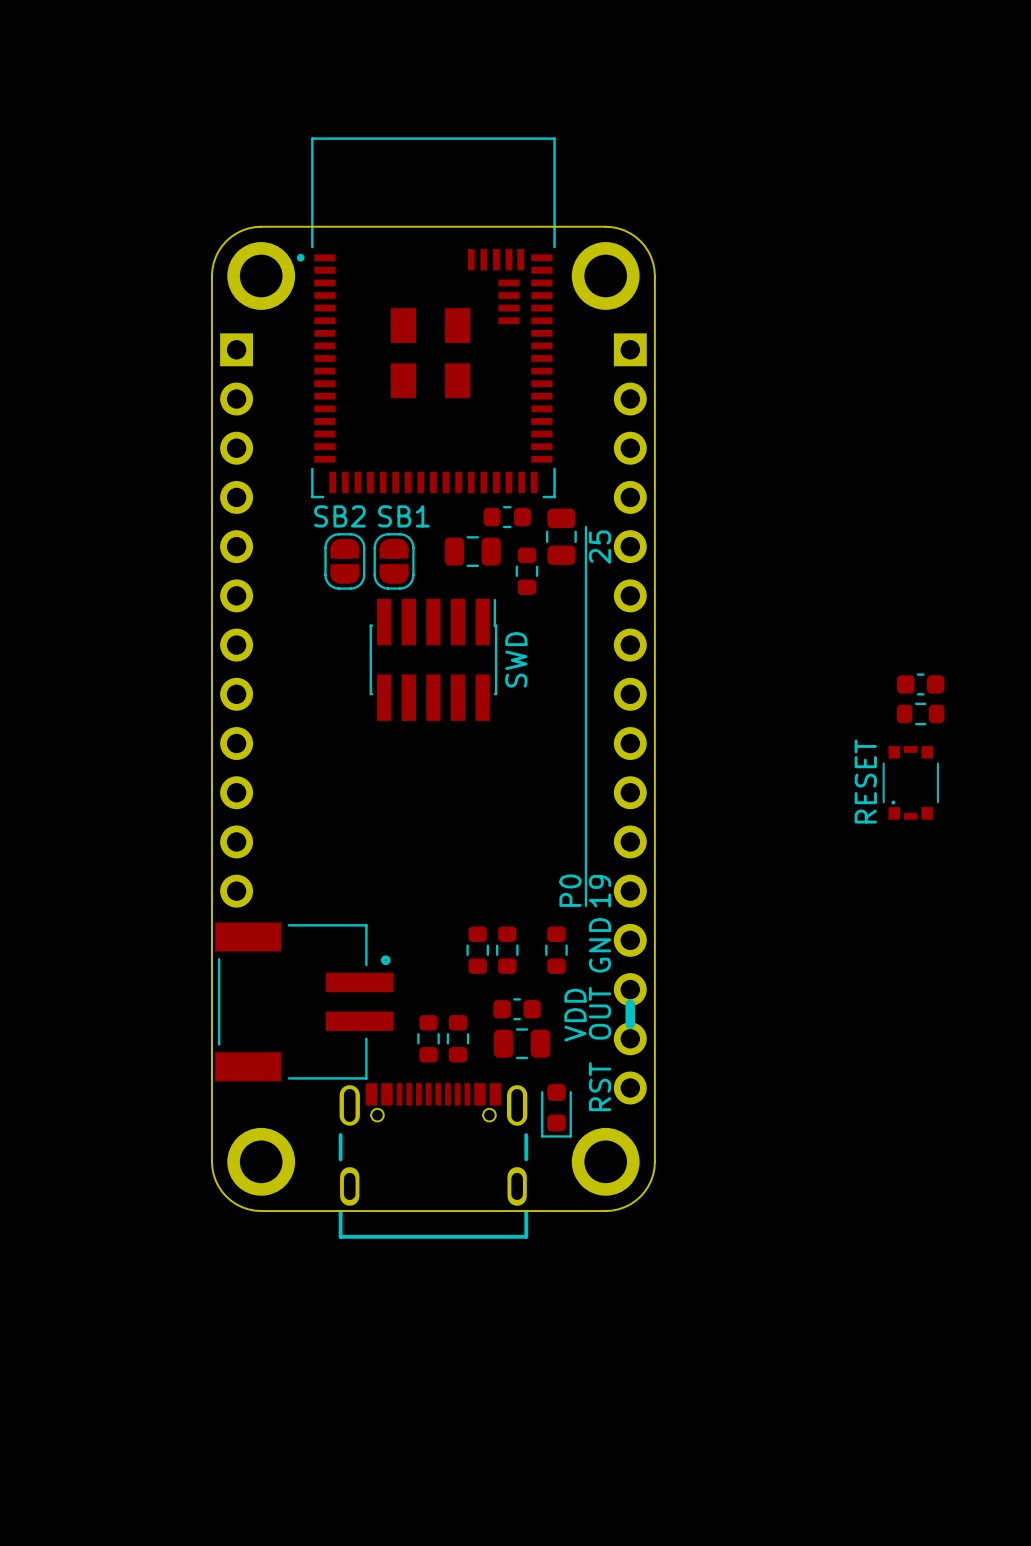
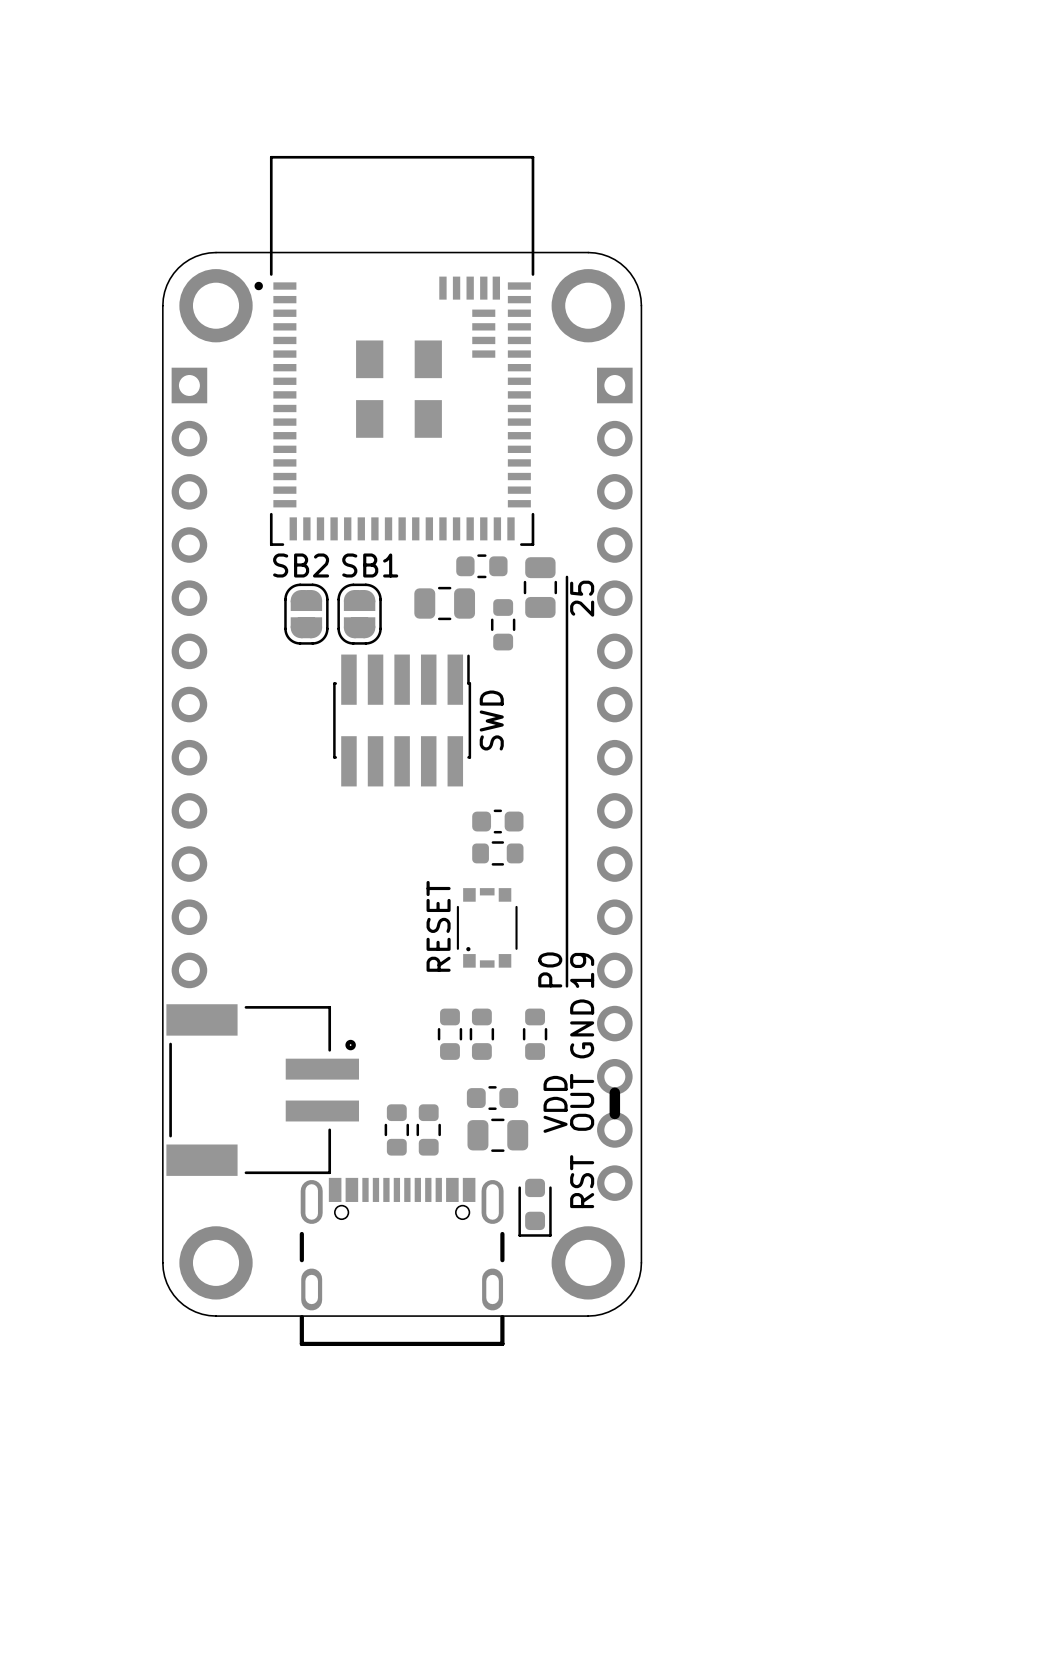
part position: (920, 684) -> (497, 821)
part position: (920, 713) -> (497, 853)
text position: RESET (865, 781) -> RESET (438, 926)
part position: (910, 782) -> (487, 927)

